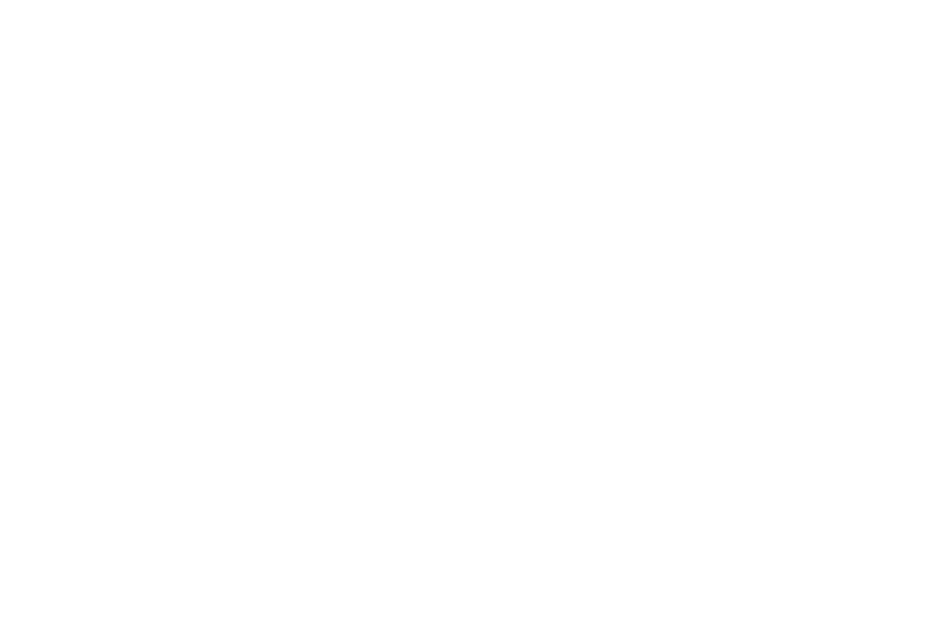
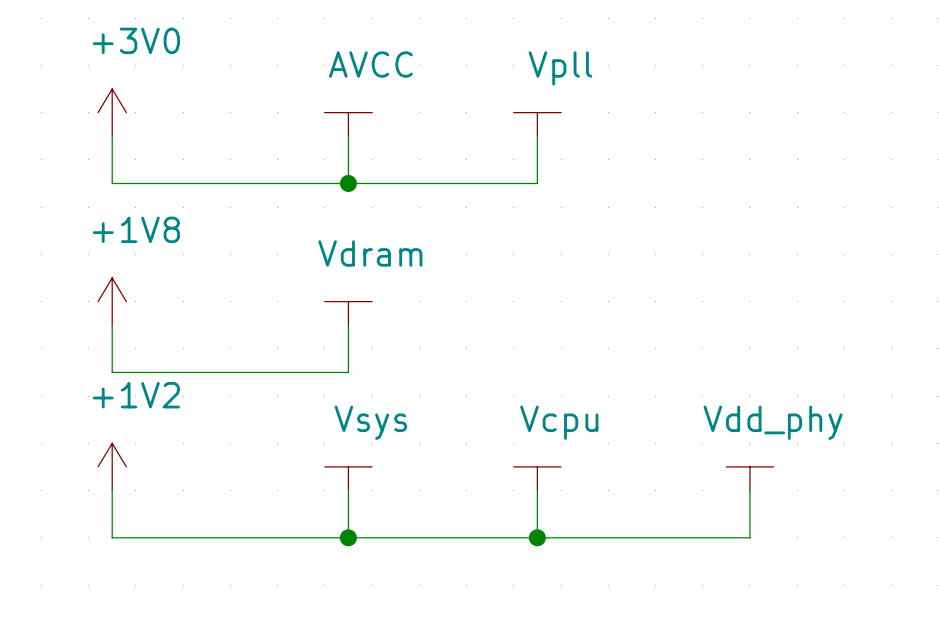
power symbol: none -> +3V0 (112, 112)
power symbol: none -> AVCC (348, 124)
power symbol: none -> Vpll (537, 124)
wire: none -> (112, 136) (112, 183) (537, 183) (537, 136)
wire: none -> (348, 136) (348, 183)
junction: none -> (348, 183)
power symbol: none -> +1V8 (112, 301)
power symbol: none -> Vdram (348, 313)
wire: none -> (112, 325) (112, 372) (348, 372) (348, 325)
power symbol: none -> +1V2 (112, 466)
power symbol: none -> Vsys (348, 478)
power symbol: none -> Vcpu (537, 478)
power symbol: none -> Vdd_phy (749, 478)
wire: none -> (112, 490) (112, 537) (749, 537) (749, 490)
wire: none -> (348, 490) (348, 537)
wire: none -> (537, 490) (537, 537)
junction: none -> (348, 537)
junction: none -> (537, 537)

